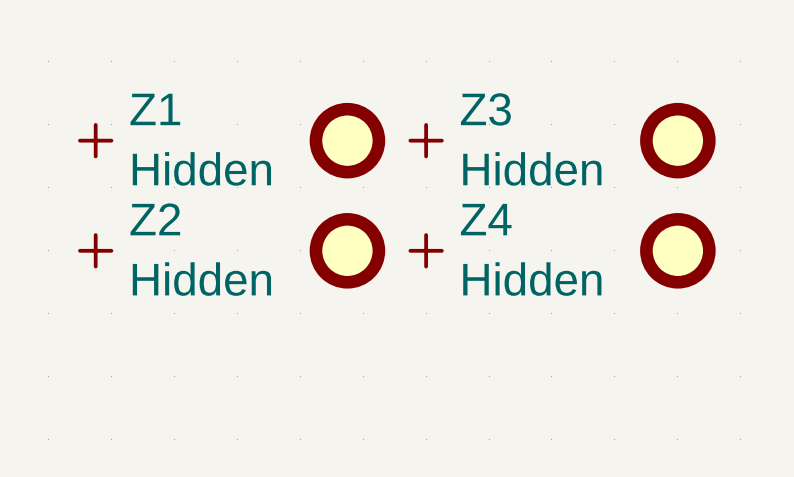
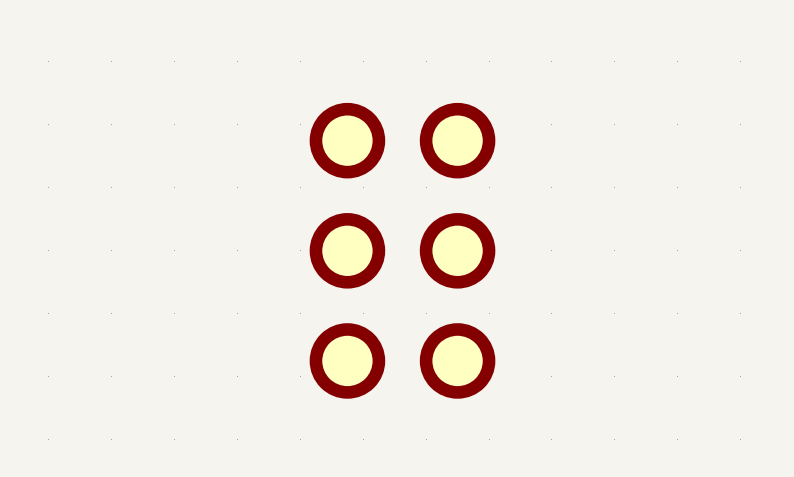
Z1: Hidden (95, 140) -> none
Z3: Hidden (426, 140) -> none
part: none -> (457, 140)
part: (677, 140) -> none
Z2: Hidden (95, 250) -> none
Z4: Hidden (426, 250) -> none
part: none -> (457, 250)
part: (677, 250) -> none
part: none -> (347, 360)
part: none -> (457, 360)

